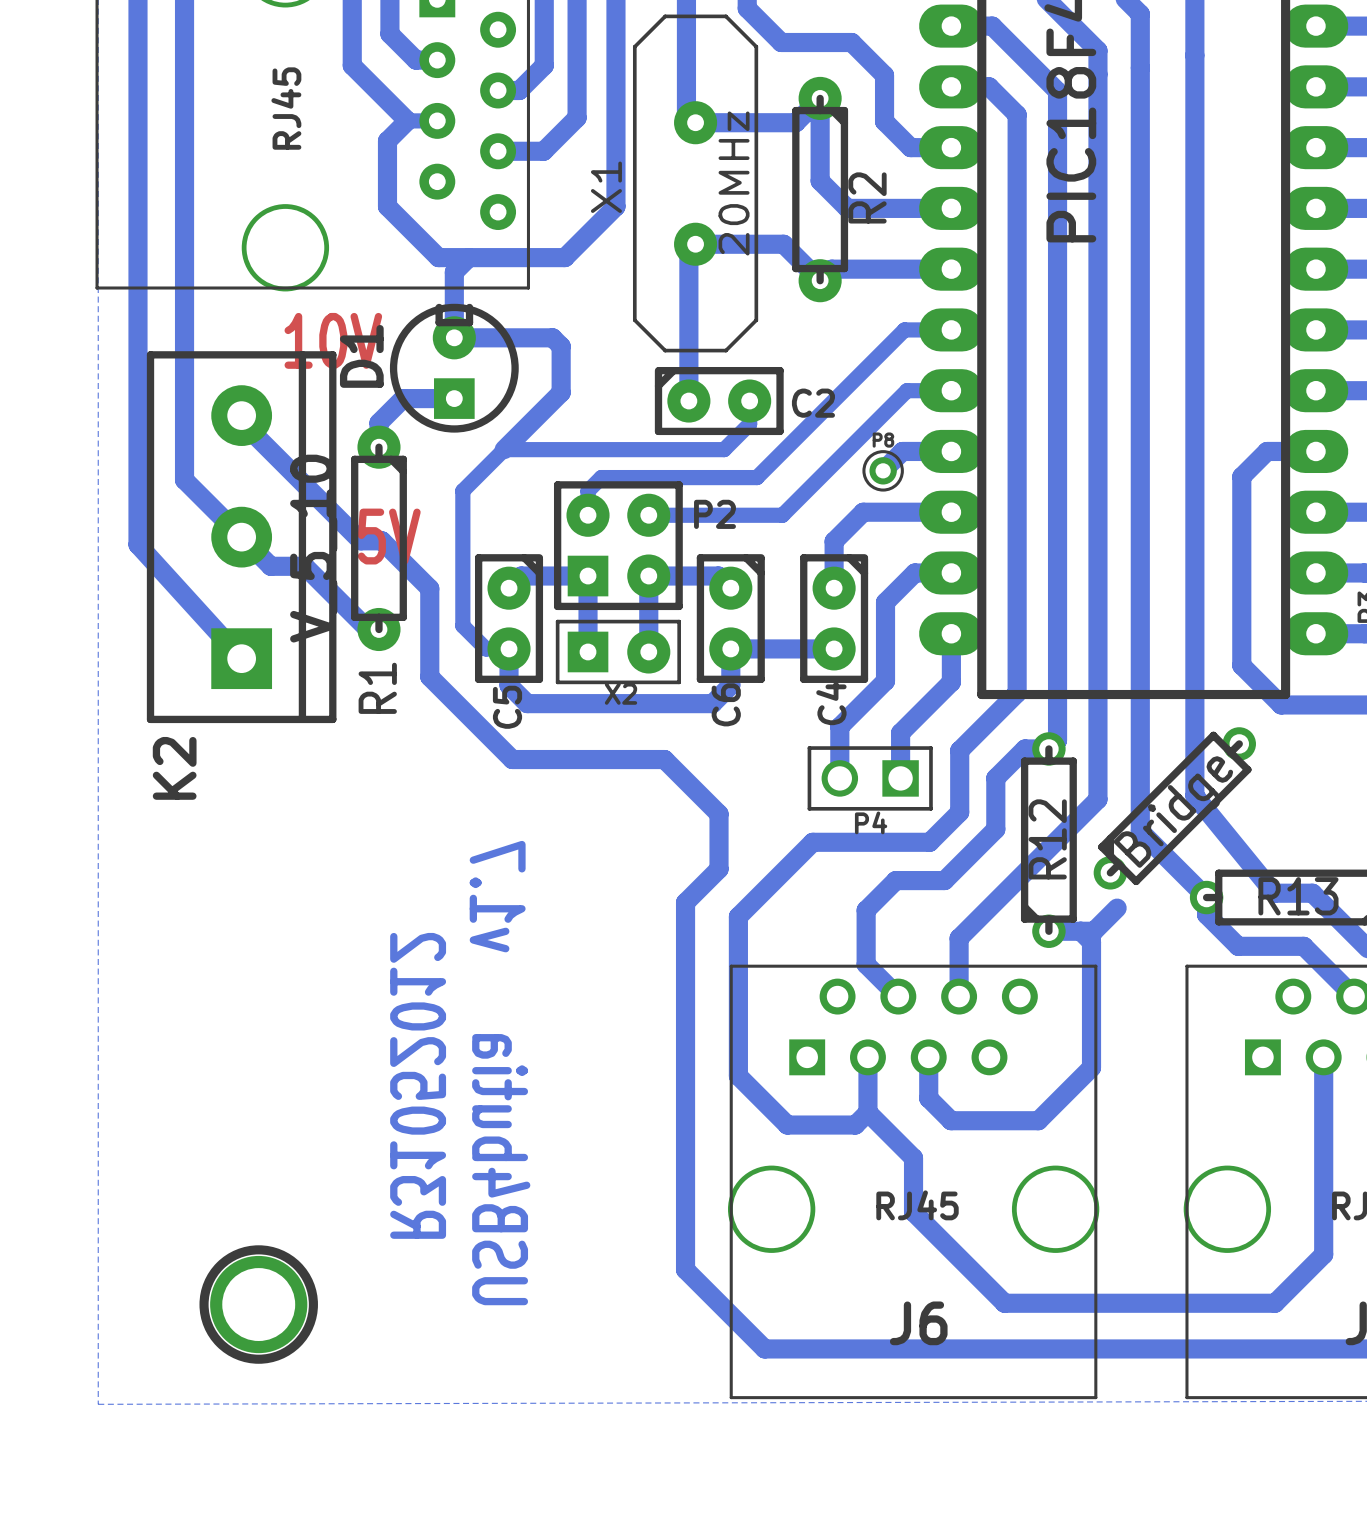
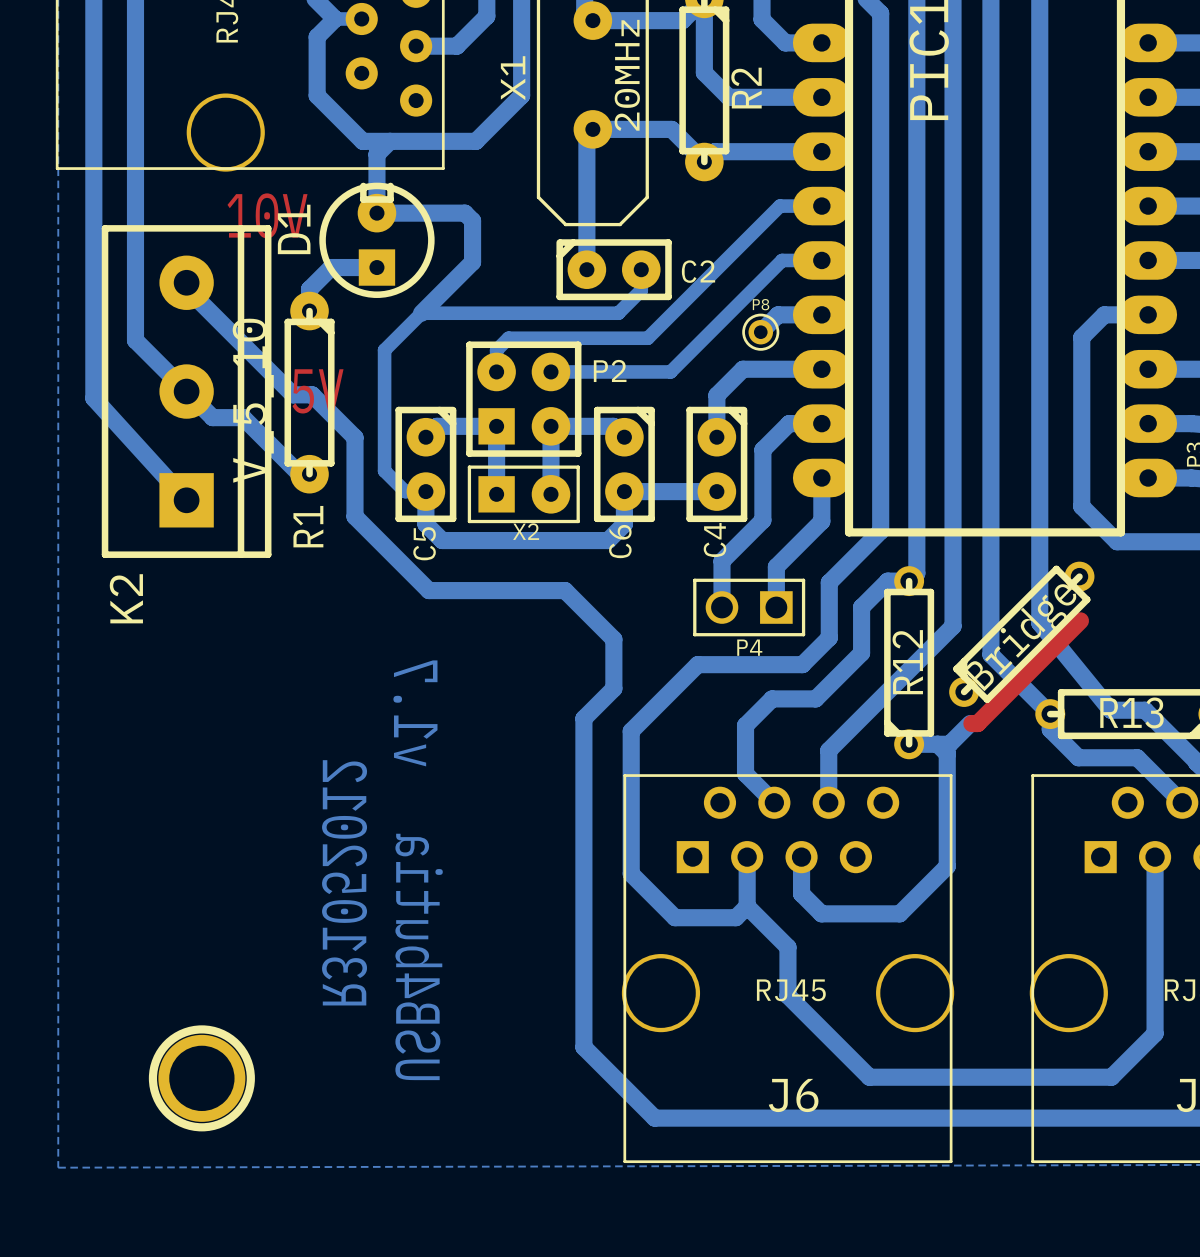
top track: none -> (1080, 620) (977, 723) (971, 723)

